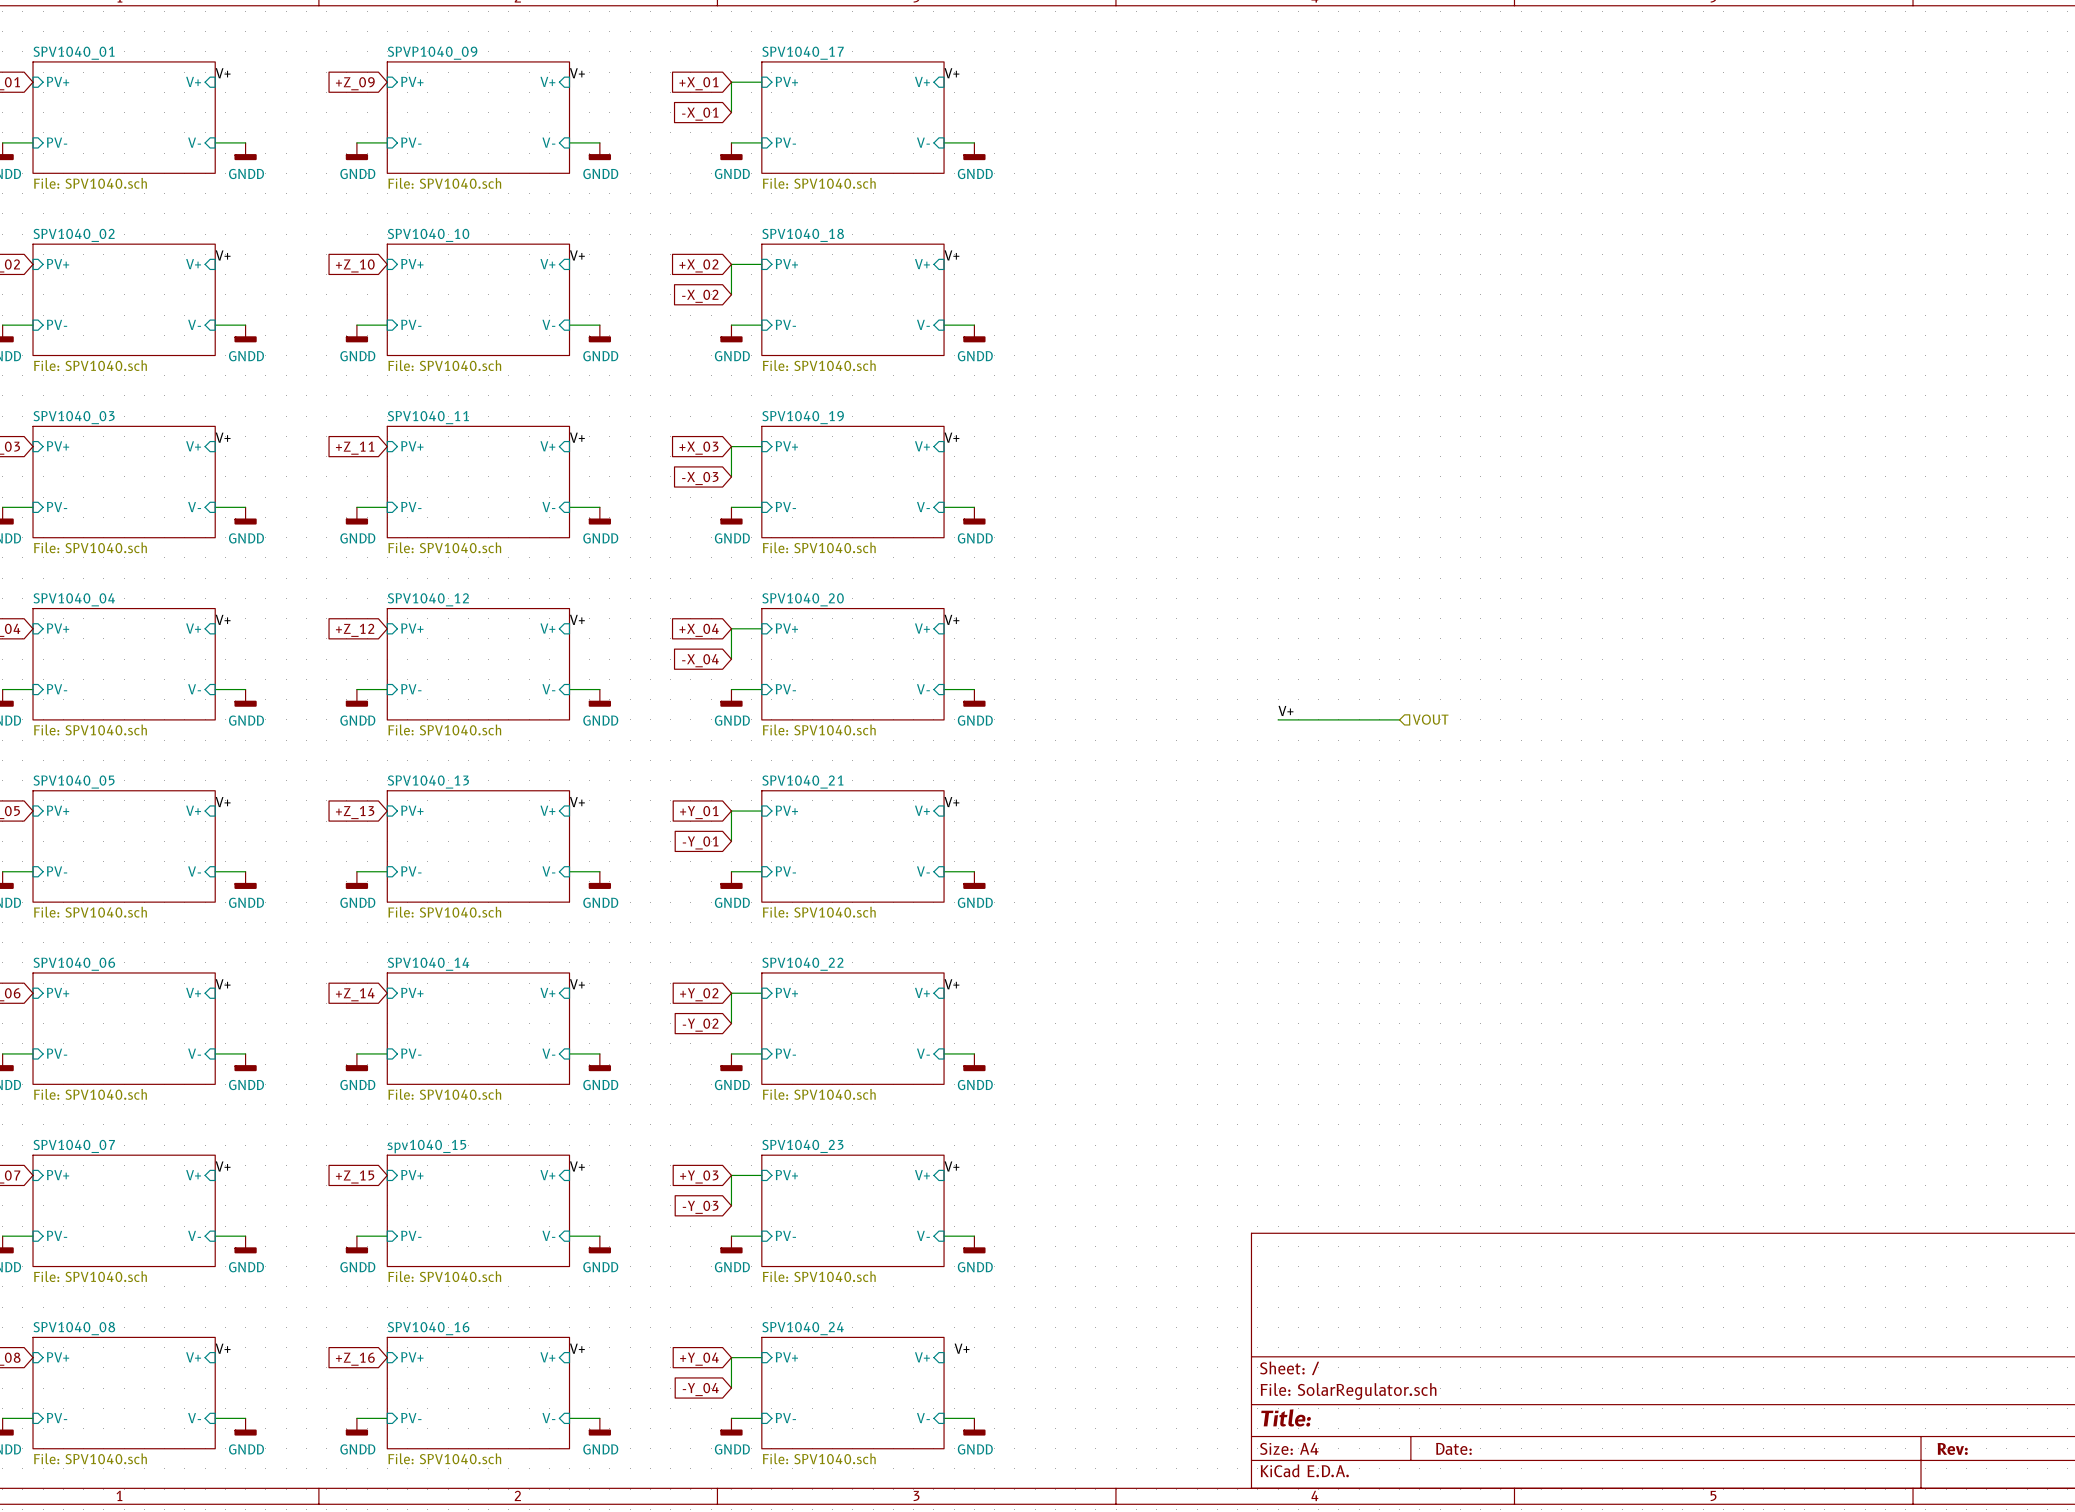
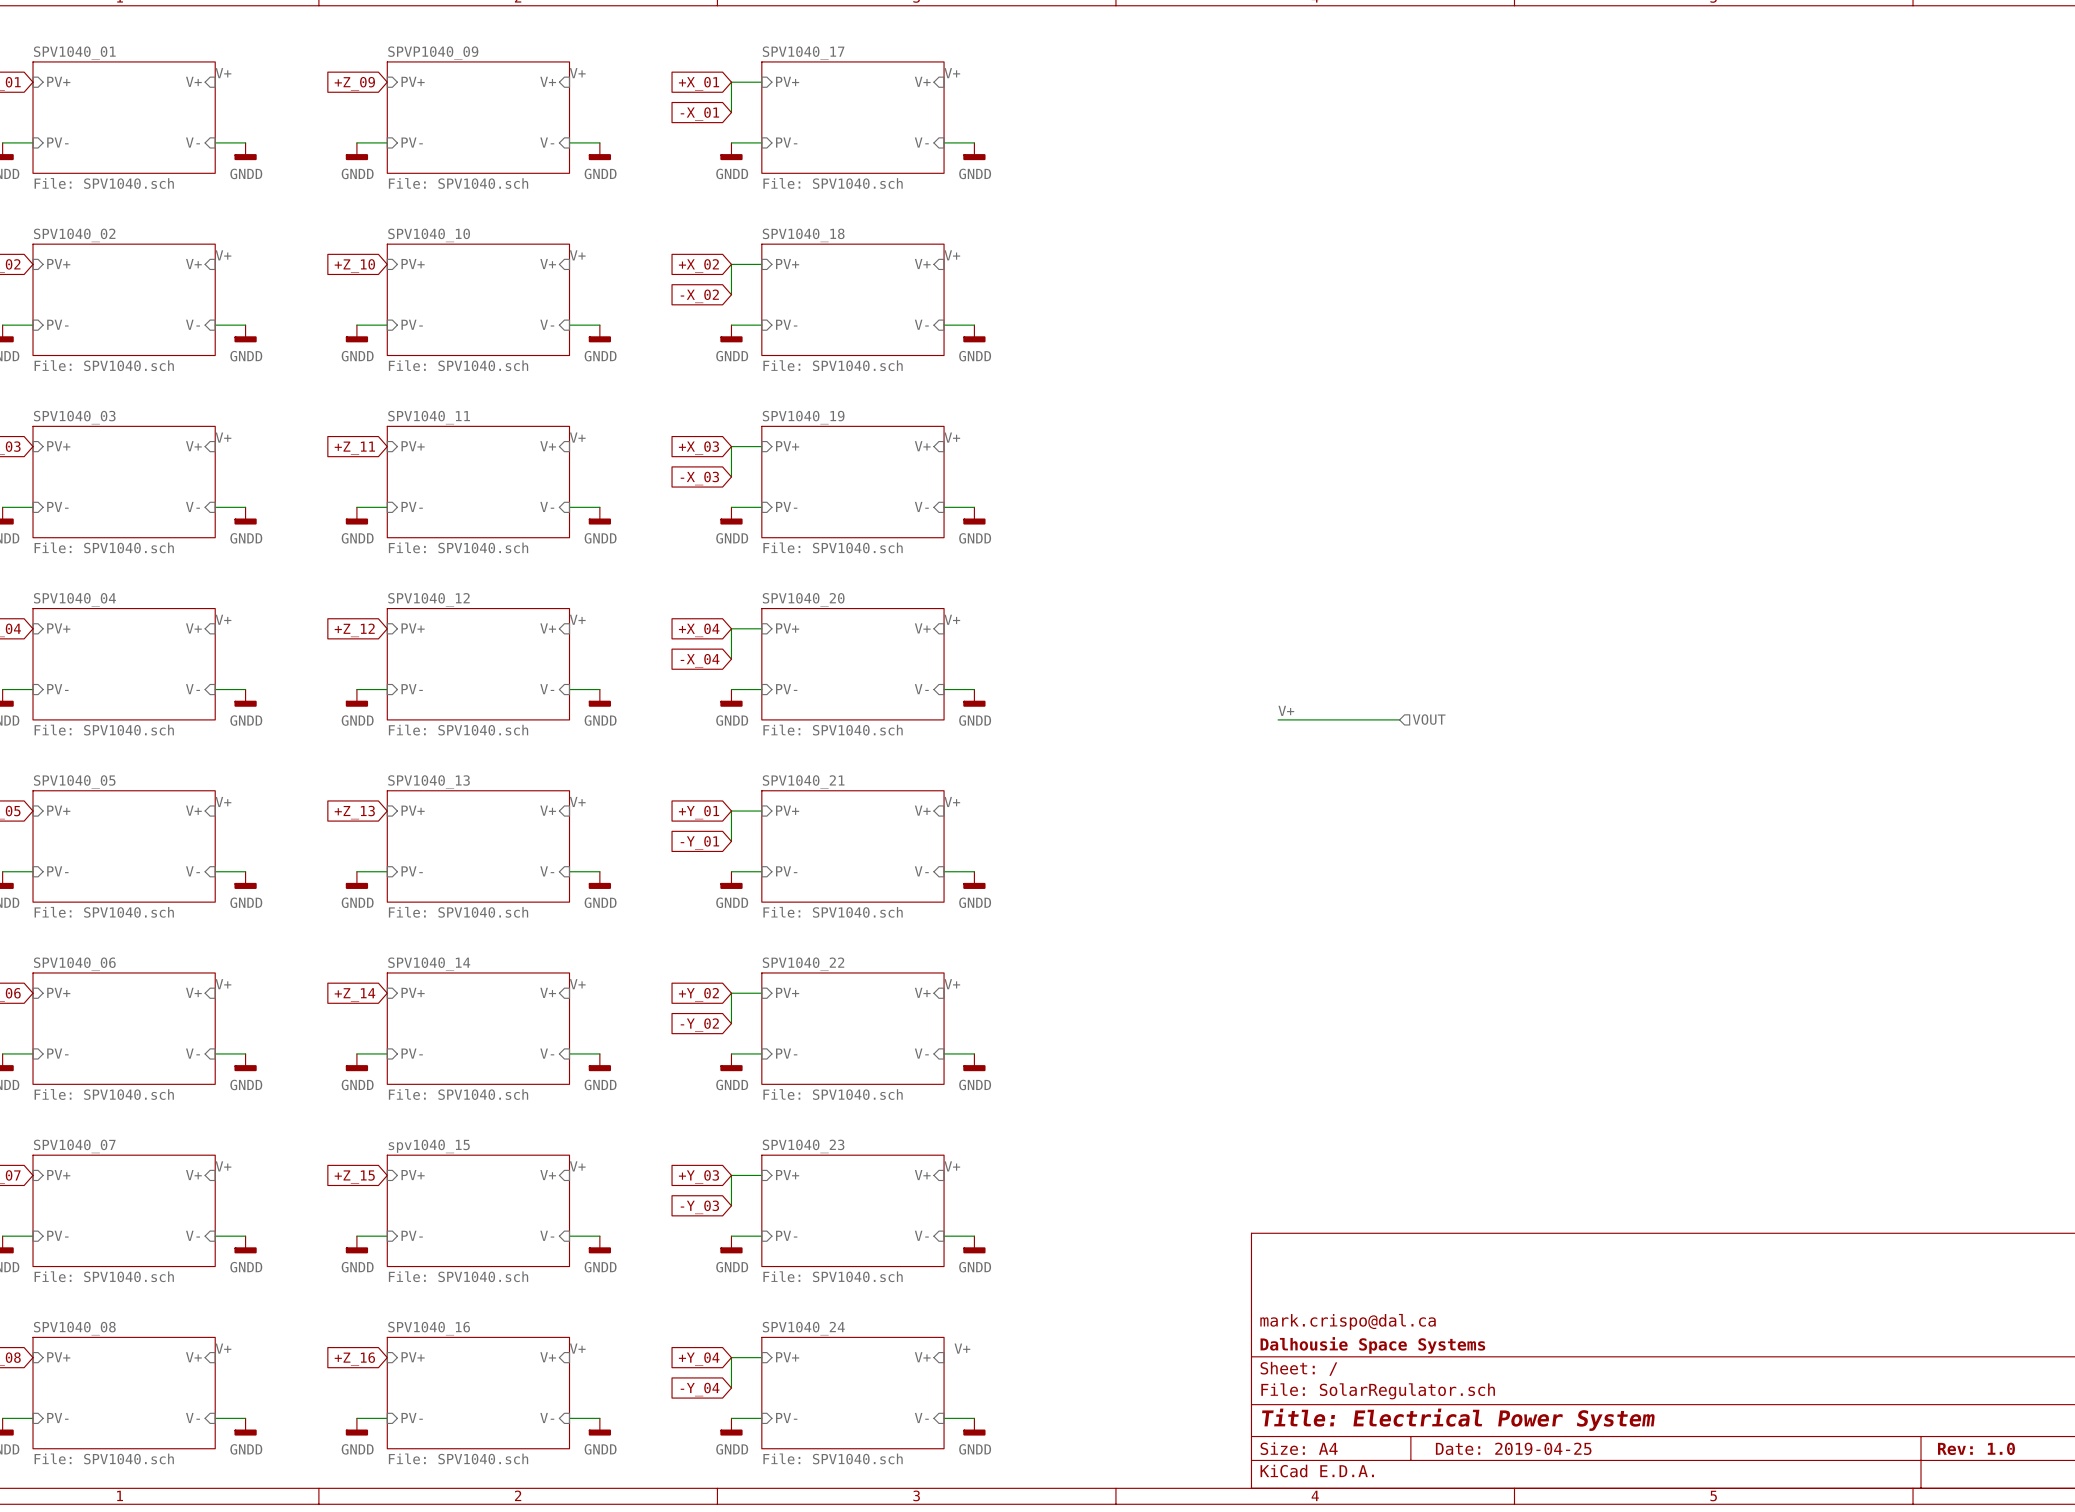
title block: none -> mark.crispo@dal.ca (1348, 1321)
title block: none -> Dalhousie Space Systems (1372, 1345)
title block: Title: (1286, 1417) -> Title: Electrical Power System (1458, 1419)
title block: Date: (1453, 1448) -> Date: 2019-04-25 (1513, 1448)
title block: Rev: (1952, 1448) -> Rev: 1.0 (1976, 1448)

